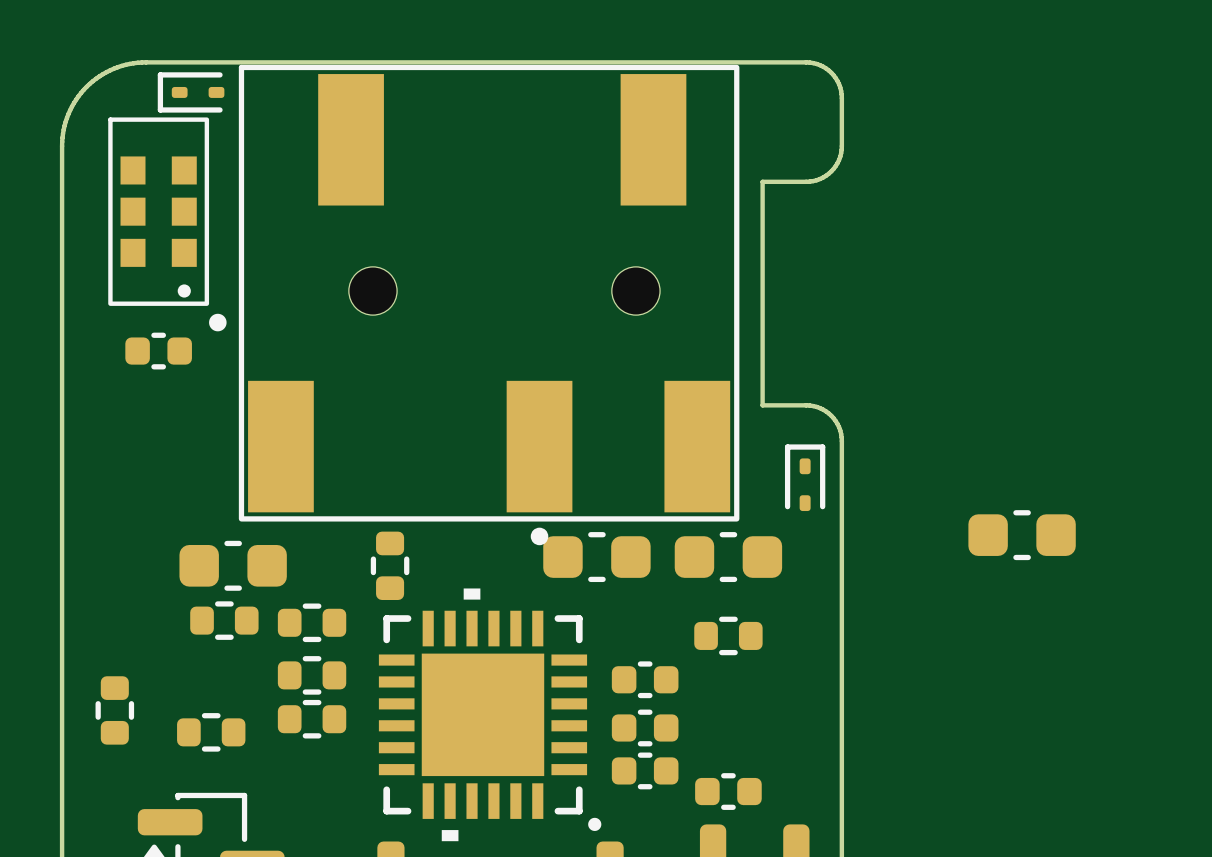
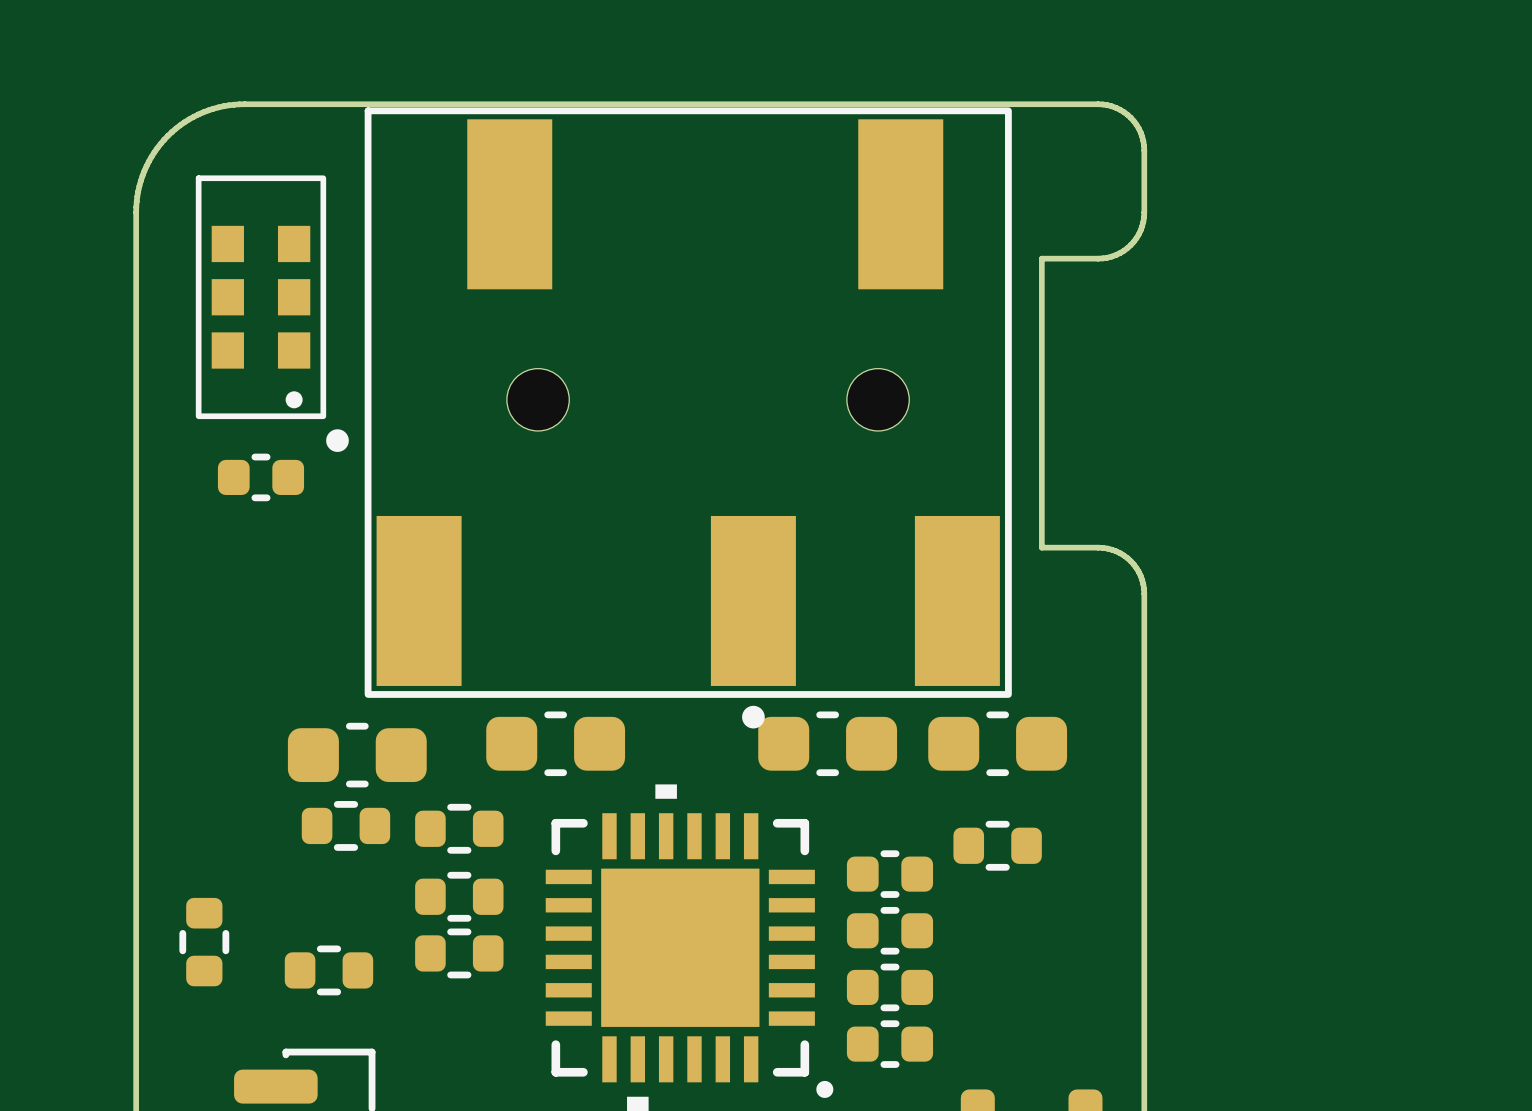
part: (191, 92) -> none
part: (805, 477) -> none
part footprint: [370, 531, 410, 601] -> [486, 711, 626, 777]
part: (1022, 535) -> none
part: none -> (889, 874)
part: (645, 679) -> none
part: none -> (889, 930)
part: (645, 727) -> none
part: none -> (889, 987)
part: (645, 770) -> none
part: none -> (889, 1044)
part: (728, 791) -> none

